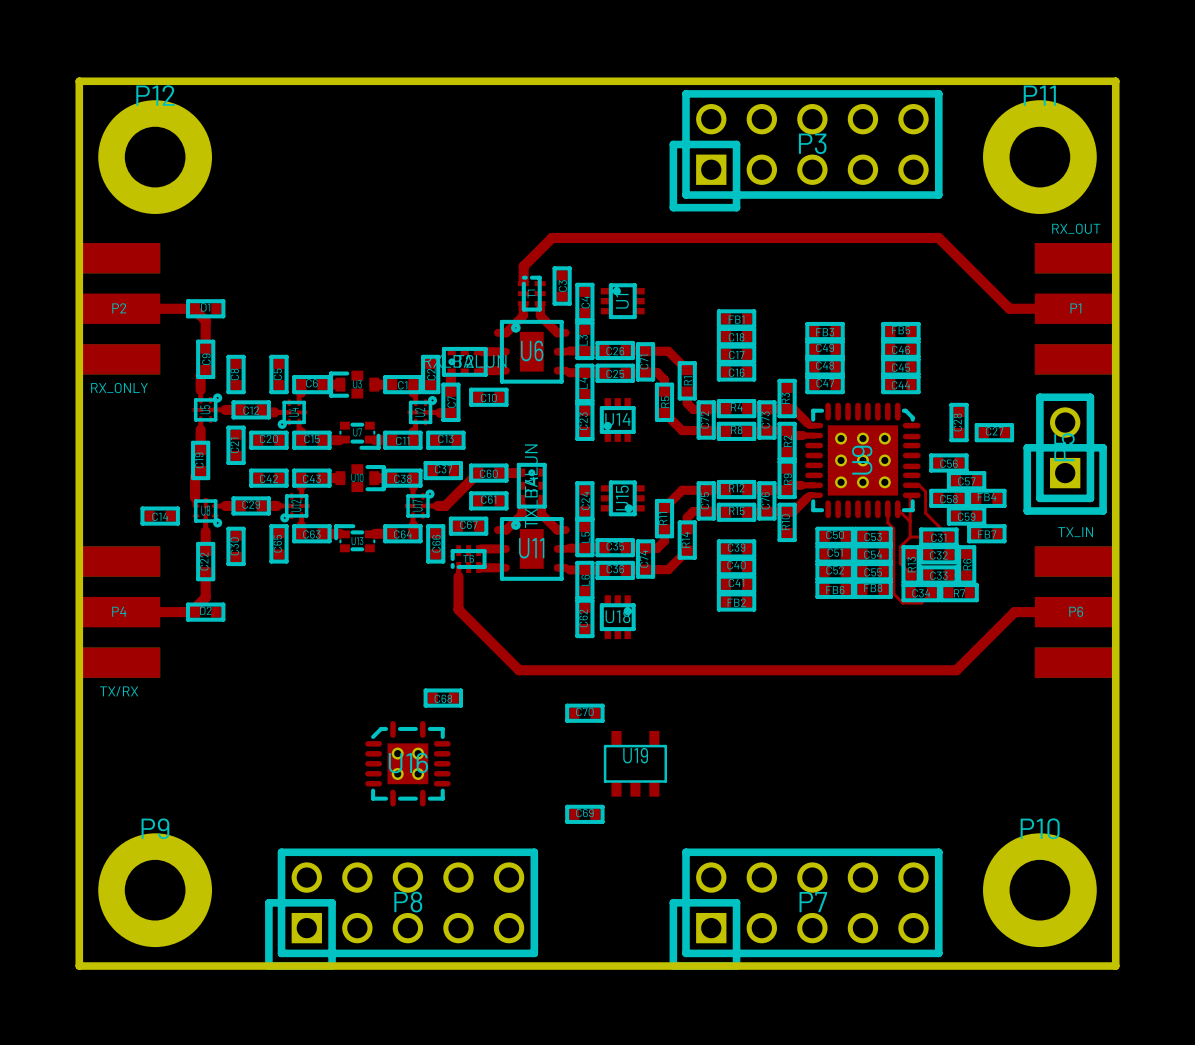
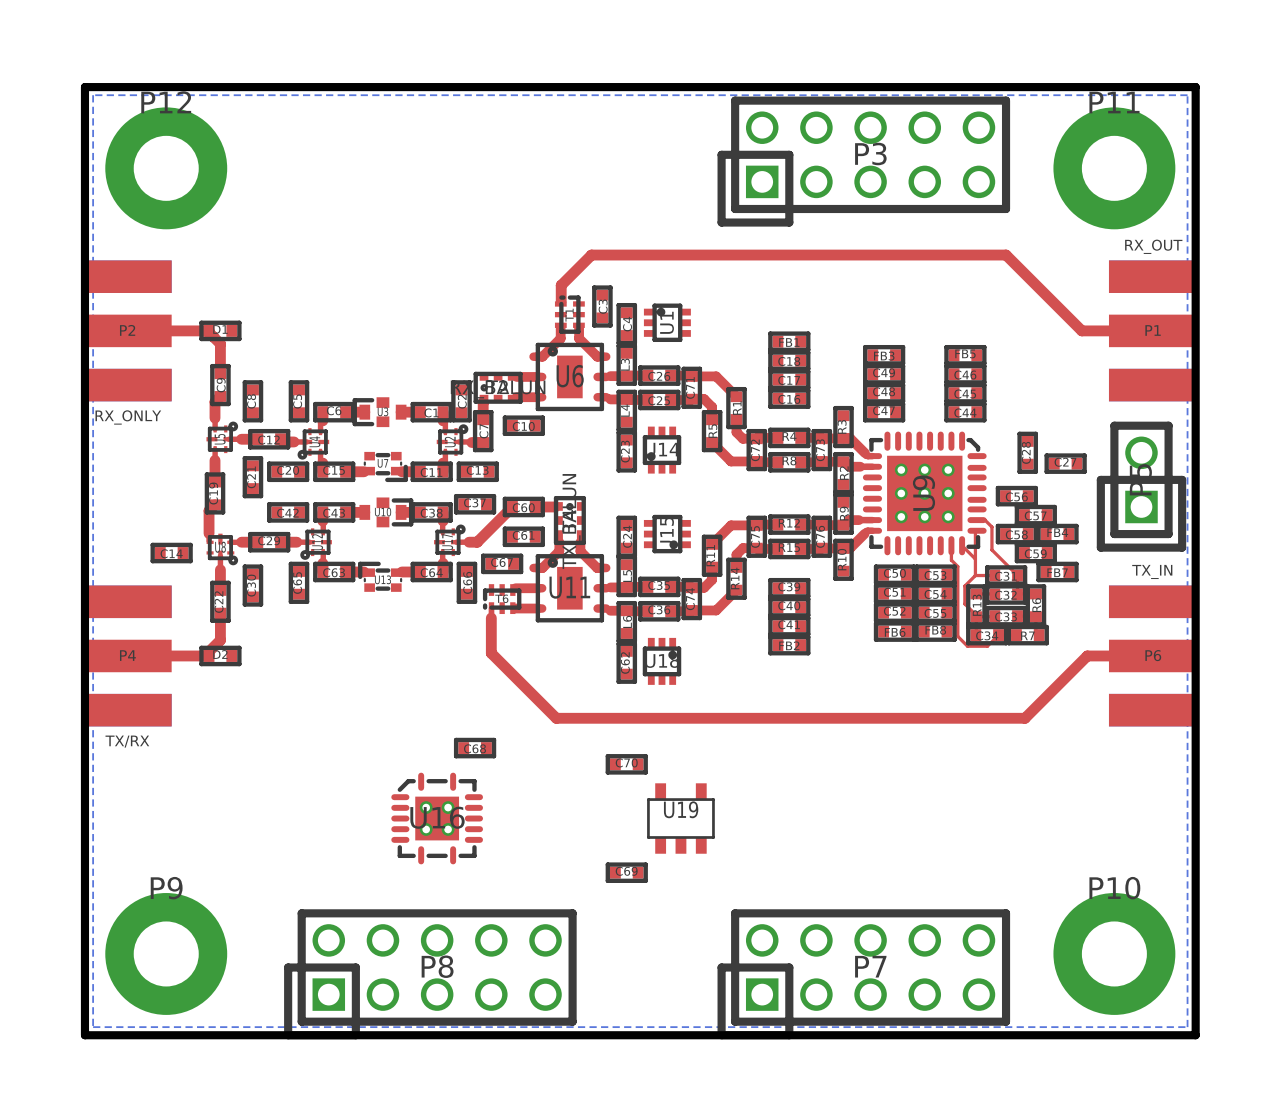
bottom zone outline: none -> (93, 95) (1187, 95) (1187, 1027) (93, 1027) (93, 95)

